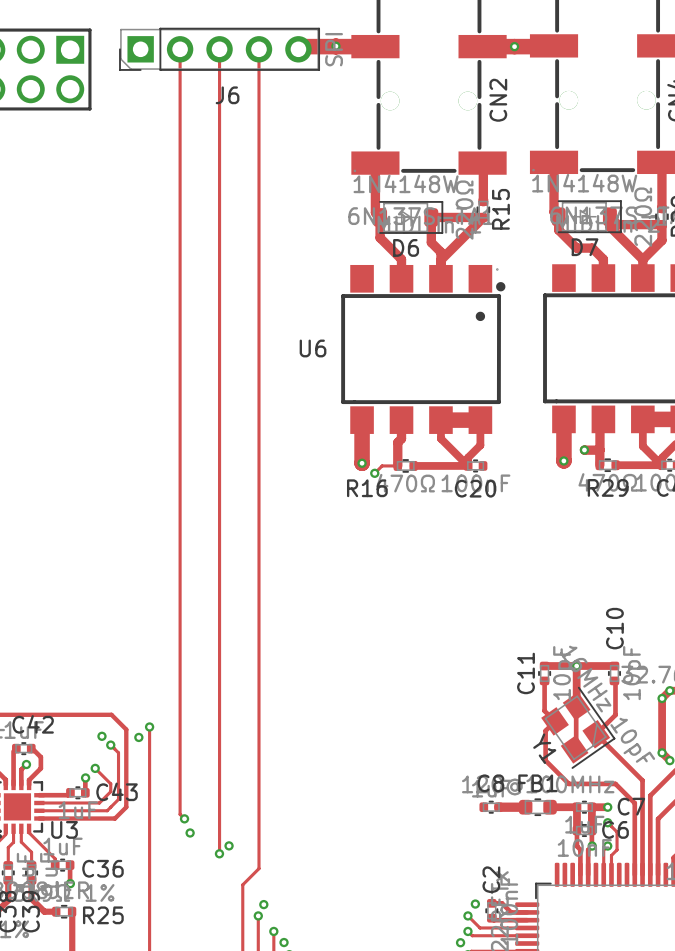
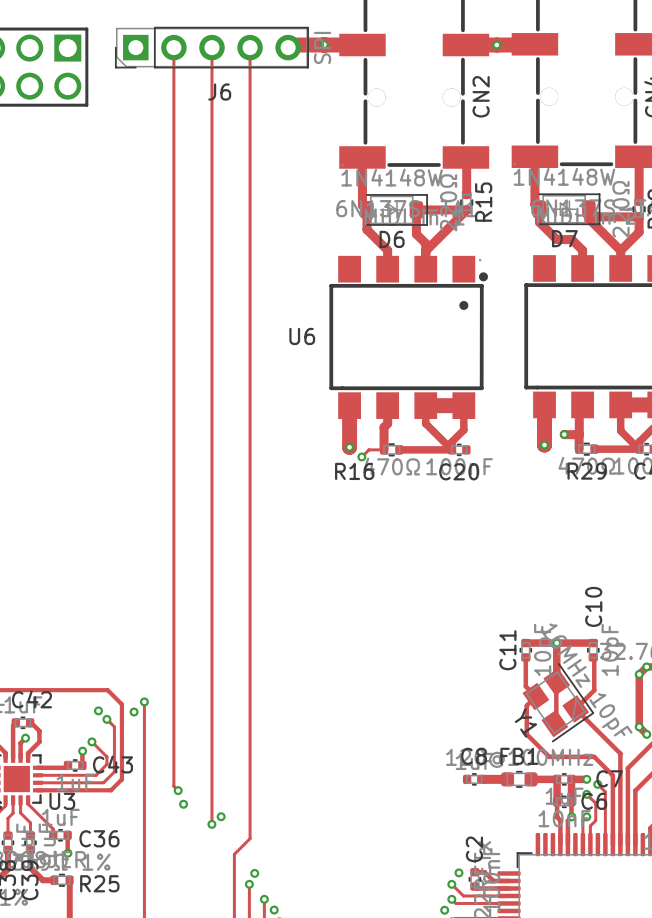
track: none -> (597, 784) (605, 792) (605, 844)
via: none -> (597, 784)

